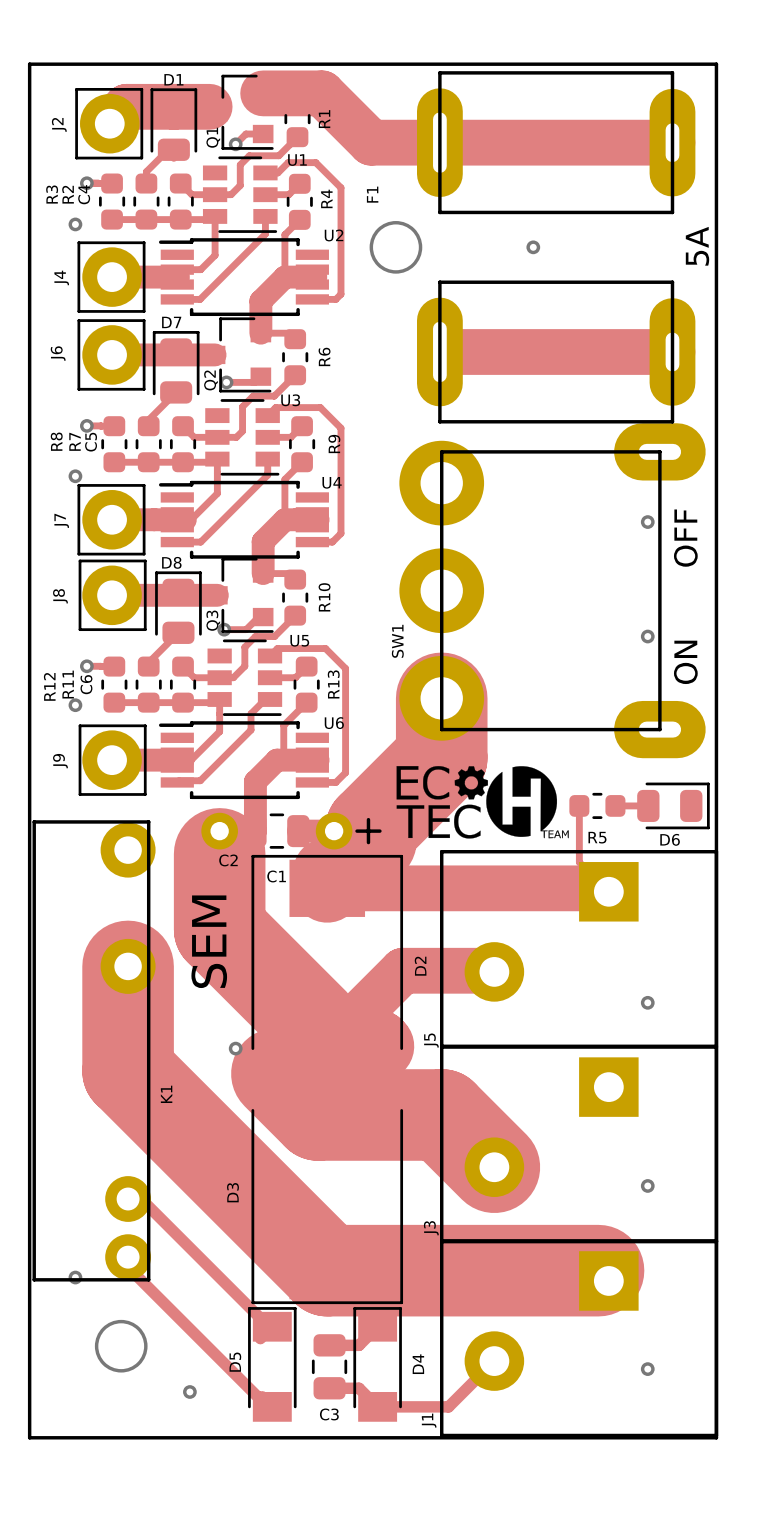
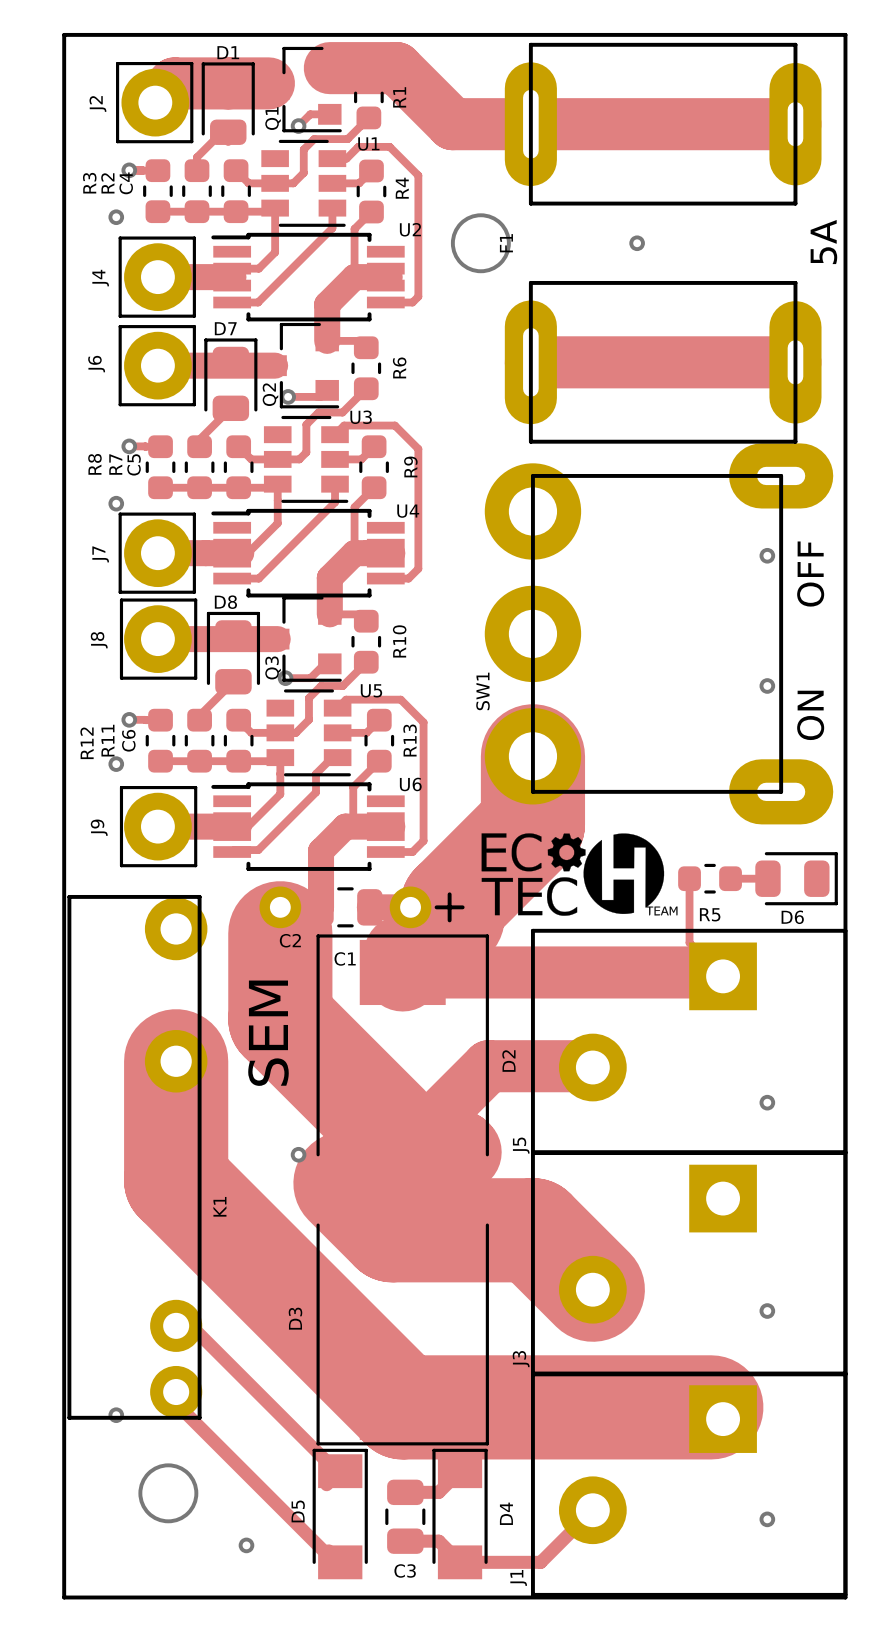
F1 name position: F1 (372, 194) -> F1 (506, 243)

